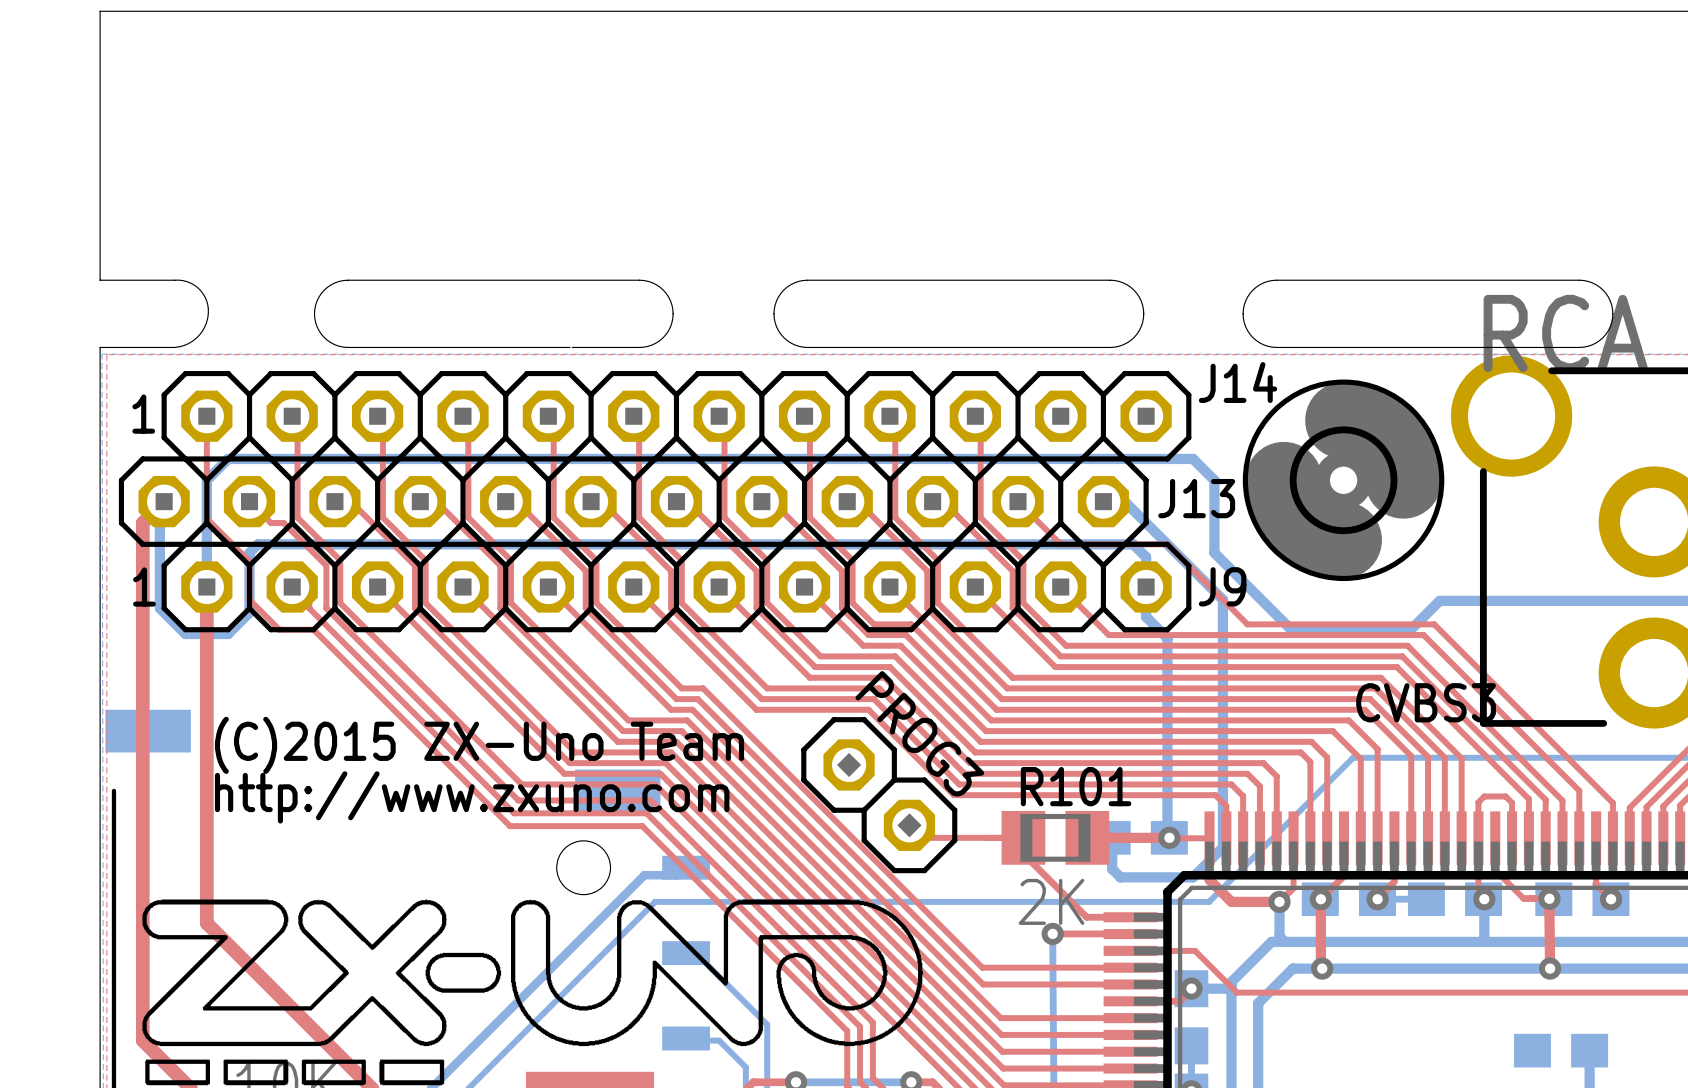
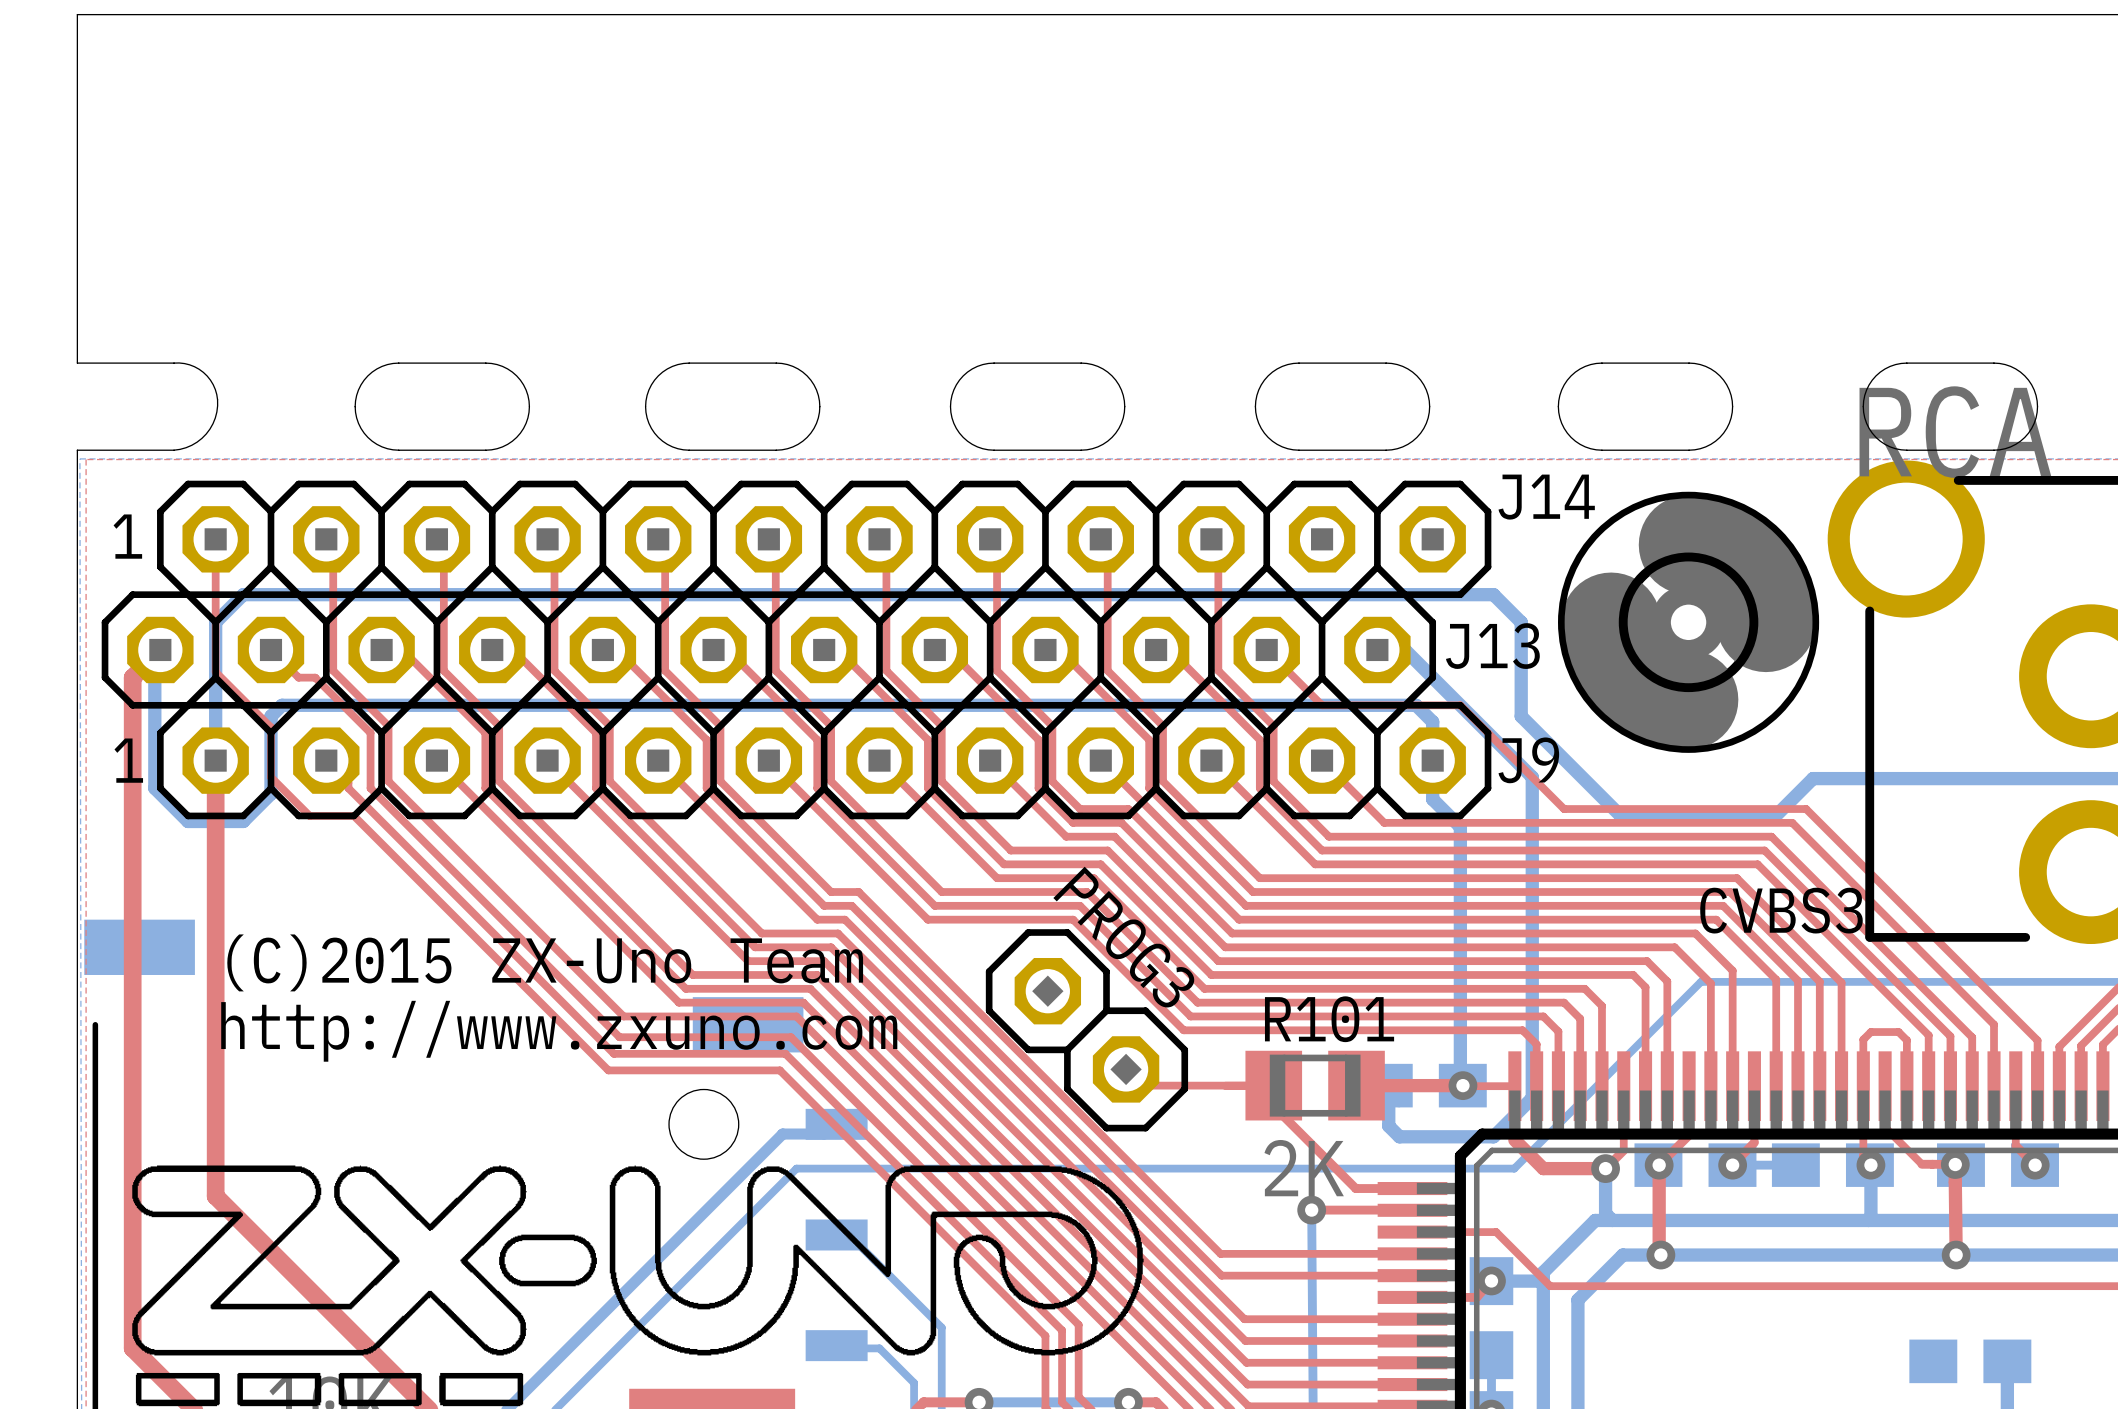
board edge: (415, 280) (572, 280) -> (689, 450) (672, 446) (658, 437) (648, 423) (645, 406) (648, 389) (658, 375) (672, 366) (689, 363)
board edge: (874, 280) (1042, 280) -> (1081, 363) (1097, 366) (1111, 375) (1121, 389) (1124, 406) (1121, 423) (1111, 437) (1097, 446) (1081, 450)
board edge: (1343, 280) (1512, 280) -> (1689, 363) (1705, 366) (1719, 375) (1729, 389) (1732, 406) (1729, 423) (1719, 437) (1705, 446) (1689, 450)
board edge: (415, 347) (570, 347) -> (485, 450) (502, 446) (516, 437) (526, 423) (529, 406) (526, 389) (516, 375) (502, 366) (485, 363)
board edge: (874, 347) (1042, 347) -> (1298, 363) (1282, 366) (1268, 375) (1258, 389) (1255, 406) (1258, 423) (1268, 437) (1282, 446) (1298, 450)
board edge: (1343, 347) (1512, 347) -> (1906, 363) (1890, 366) (1876, 375) (1866, 389) (1863, 406) (1866, 423) (1876, 437) (1890, 446) (1906, 450)

